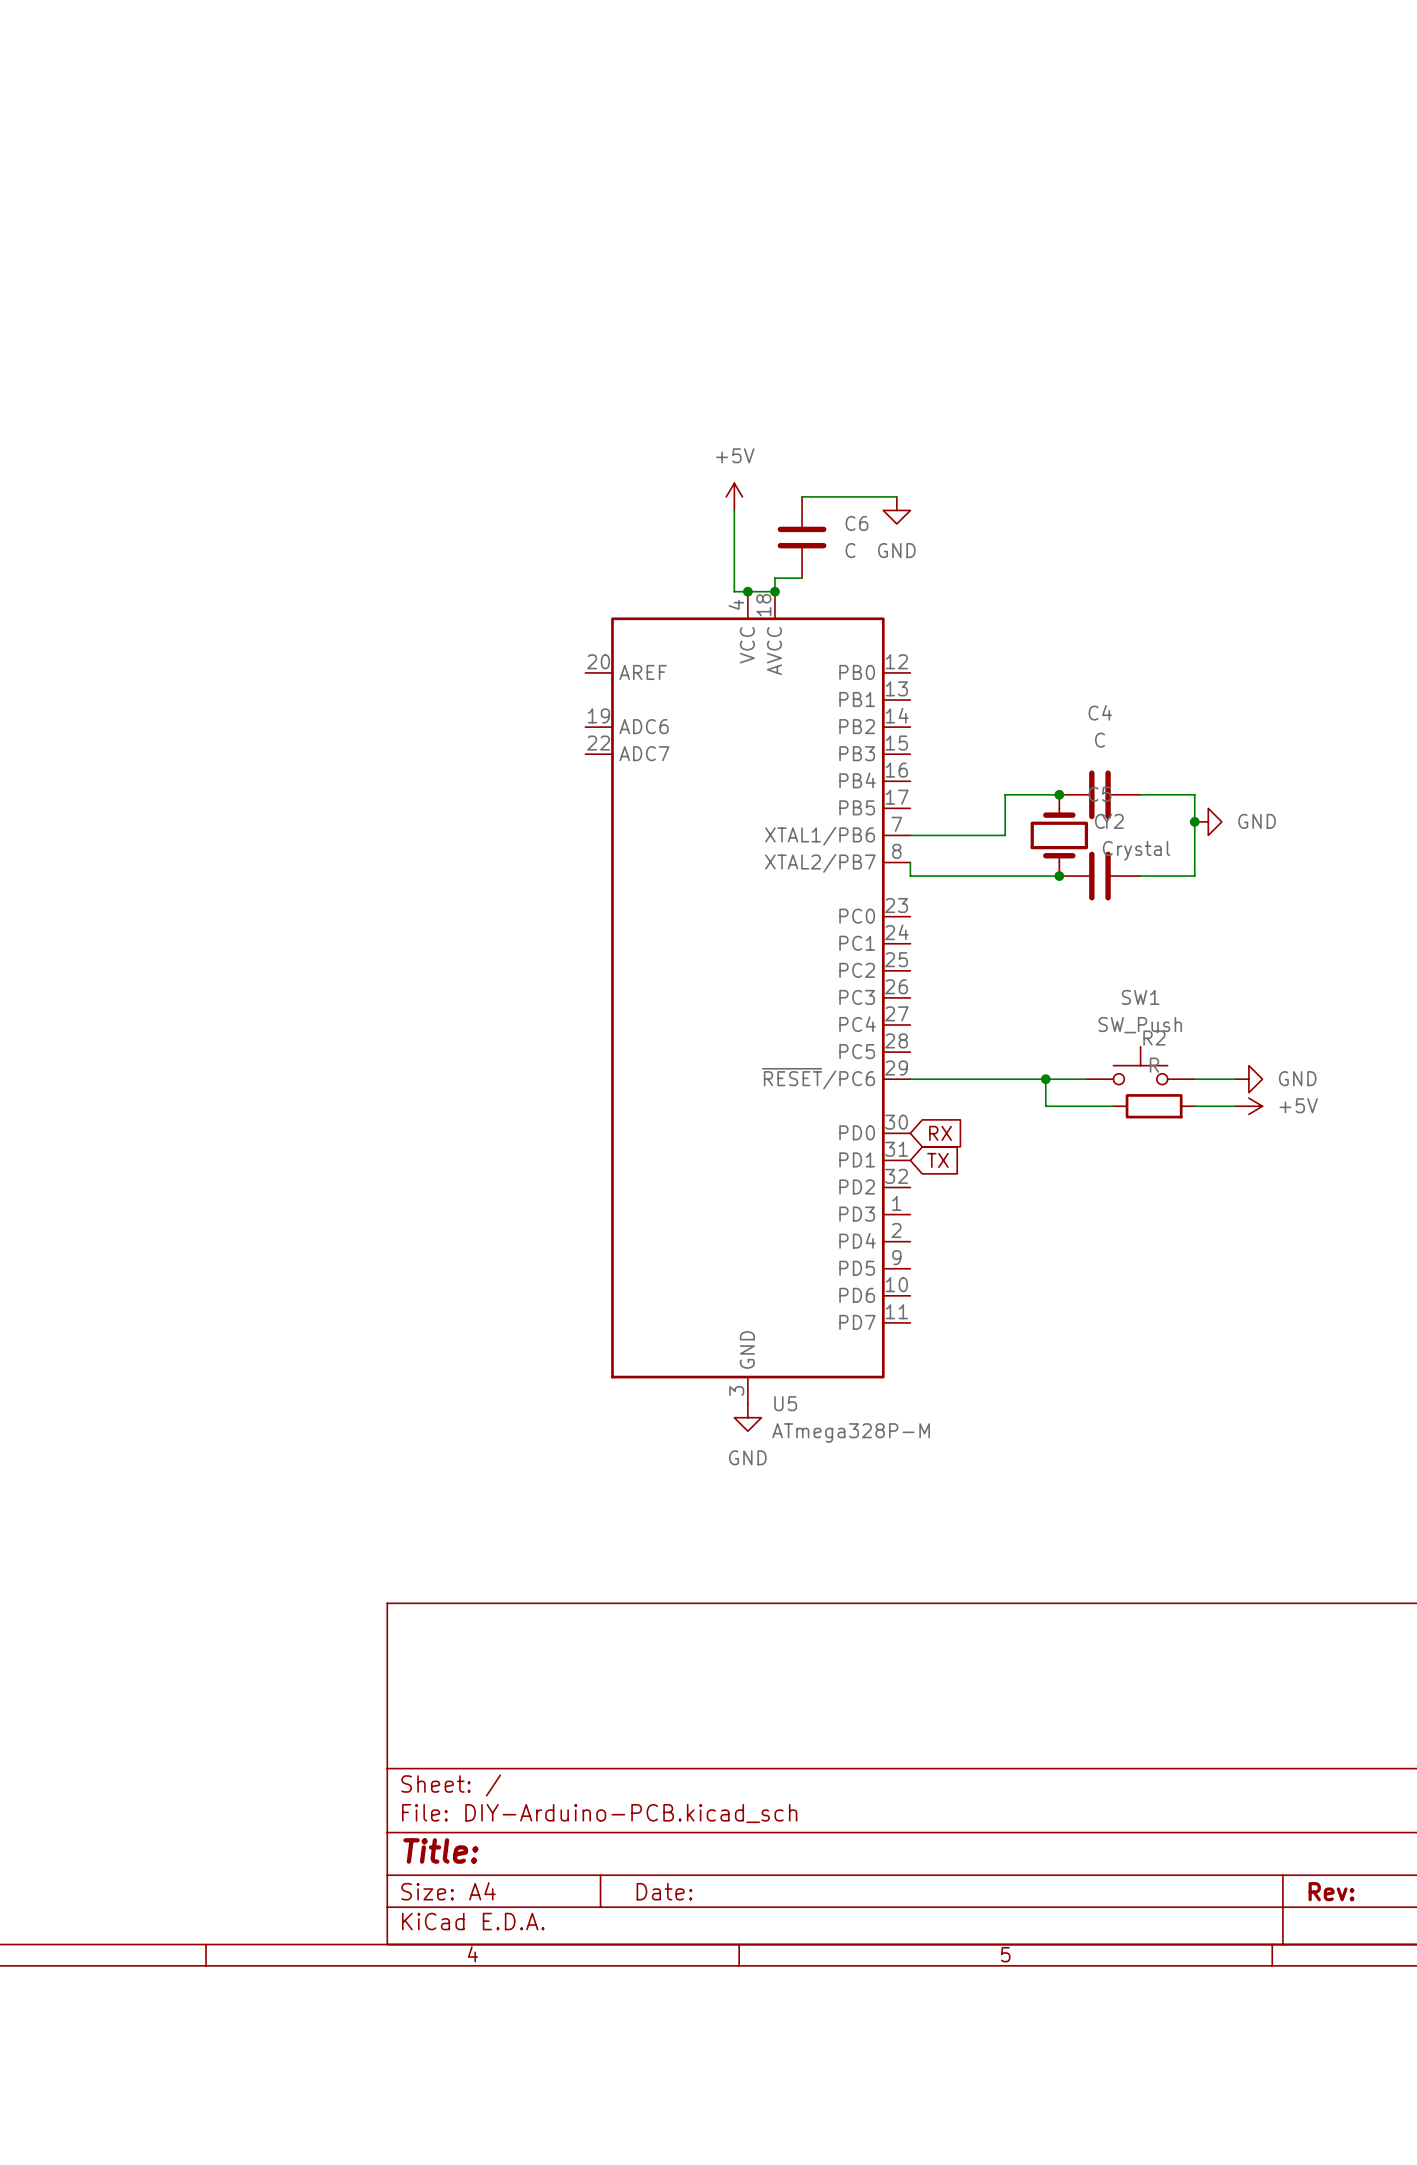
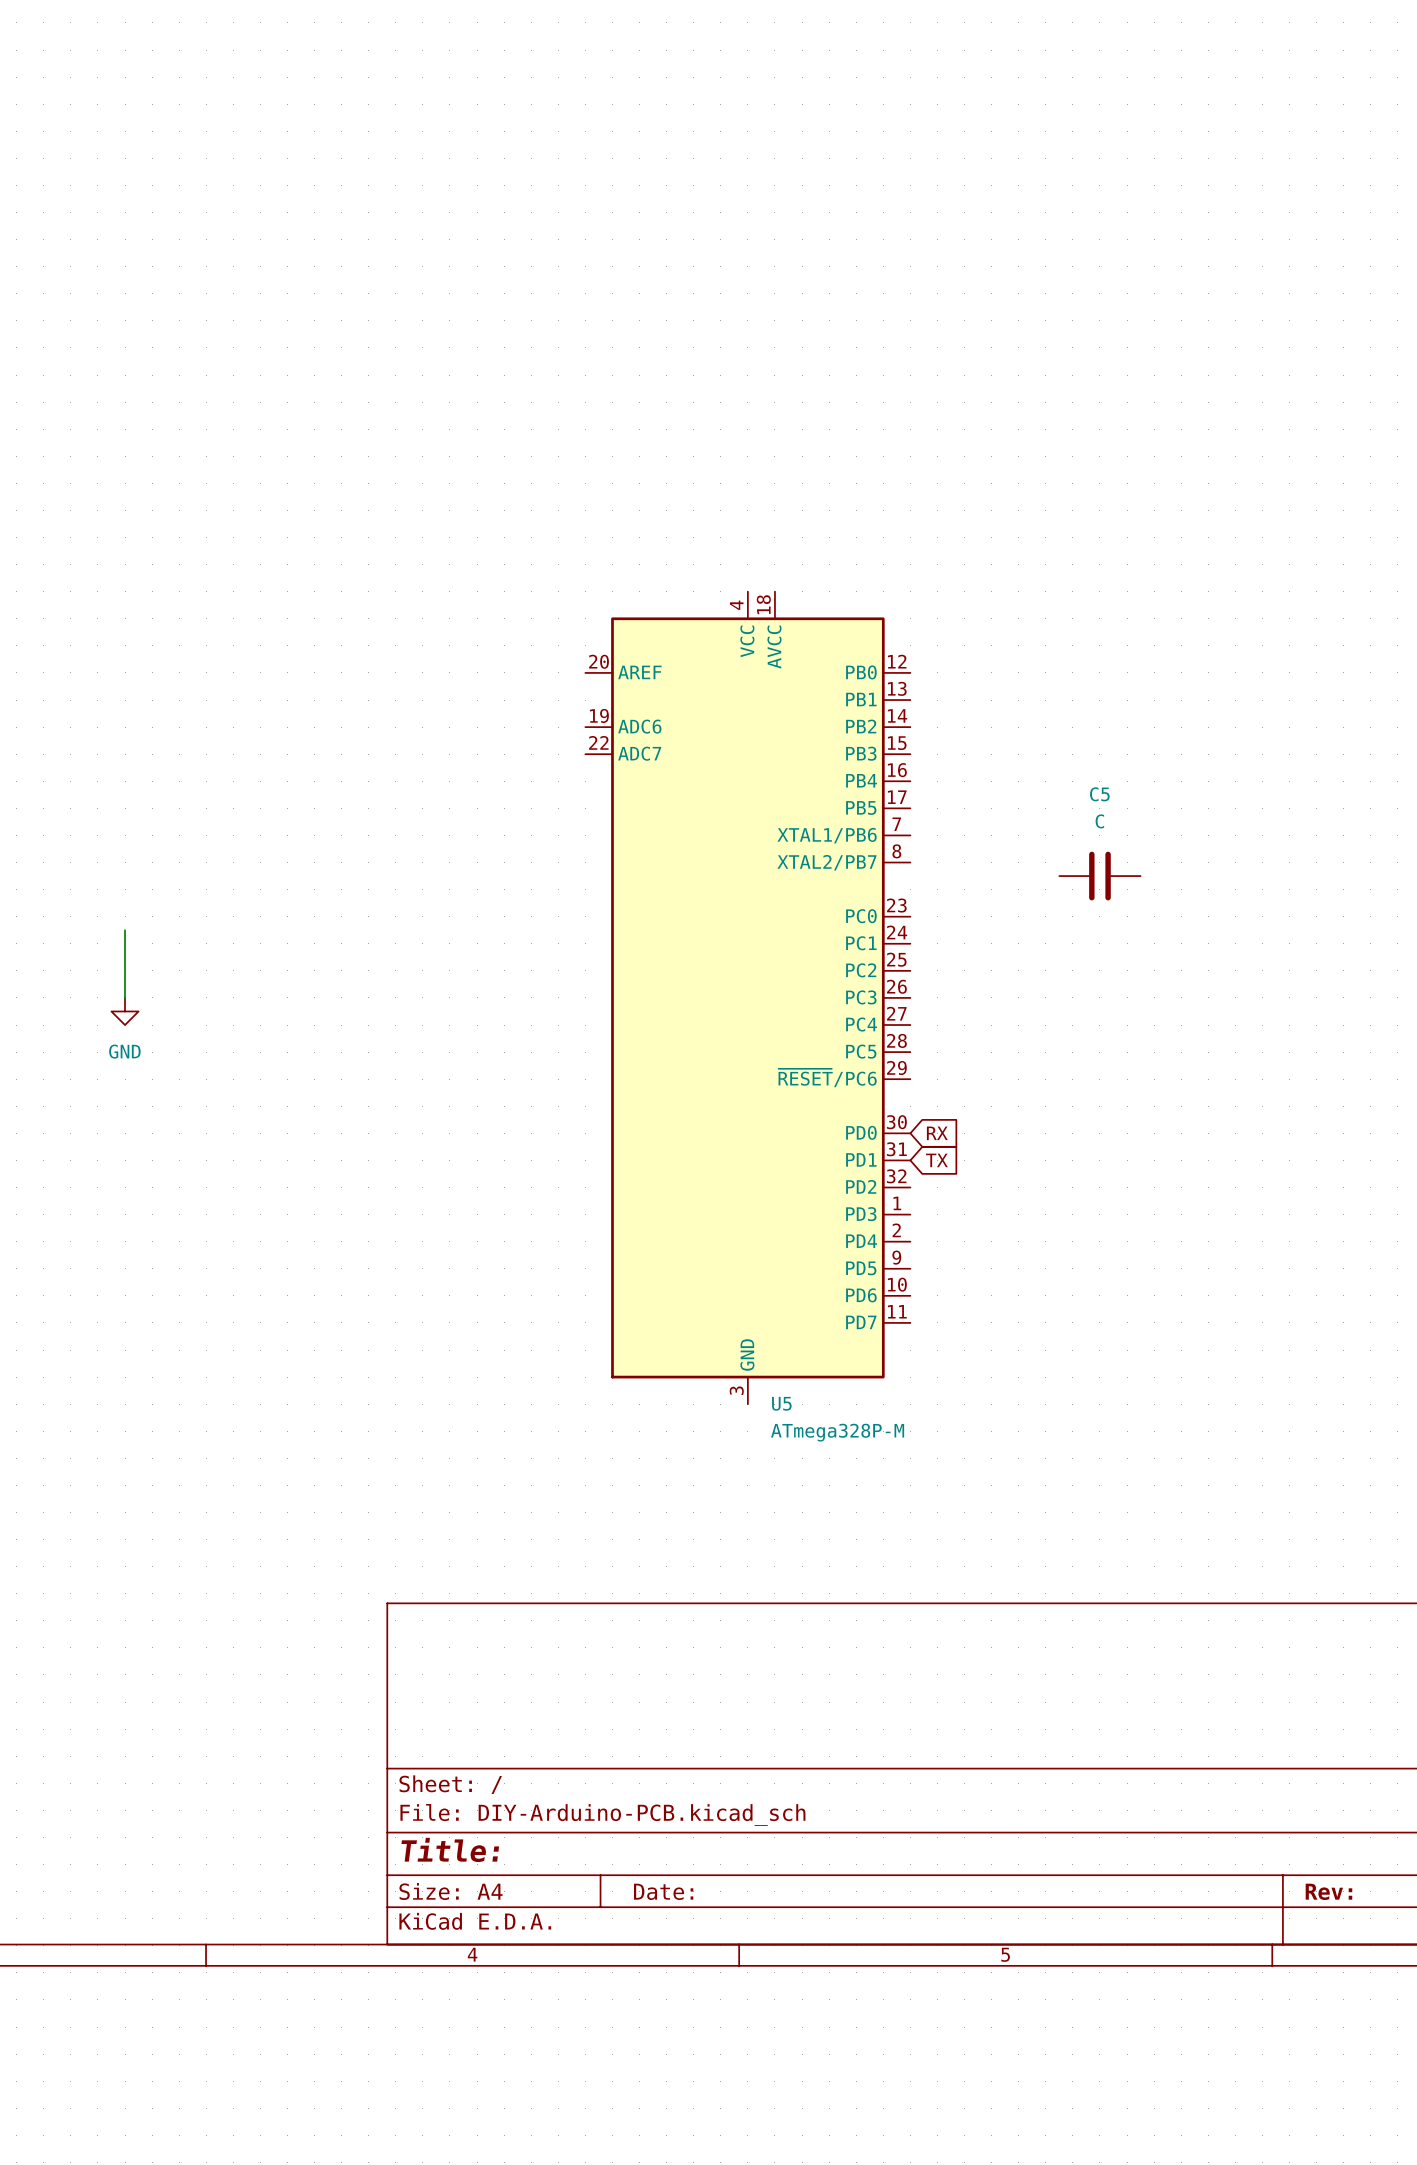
power symbol: +5V (734, 496) -> none
wire: (802, 496) (896, 496) -> none
wire: (734, 510) (734, 591) (774, 591) (774, 578) (802, 578) -> none
power symbol: GND (896, 510) -> none
C6: C (802, 537) -> none
junction: (747, 591) -> none
junction: (774, 591) -> none
wire: (1059, 794) (1005, 794) (1005, 835) (910, 835) -> none
junction: (1059, 794) -> none
C4: C (1099, 794) -> none
wire: (1140, 794) (1194, 794) (1194, 876) (1140, 876) -> none
junction: (1194, 821) -> none
power symbol: GND (1208, 821) -> none
Y2: Crystal (1059, 835) -> none
wire: (910, 862) (910, 876) (1059, 876) -> none
junction: (1059, 876) -> none
wire: none -> (125, 930) (125, 997)
power symbol: none -> GND (125, 1011)
SW1: SW_Push (1140, 1065) -> none
wire: (910, 1079) (1086, 1079) -> none
wire: (1045, 1079) (1045, 1106) (1113, 1106) -> none
junction: (1045, 1079) -> none
wire: (1194, 1079) (1235, 1079) -> none
power symbol: GND (1248, 1079) -> none
R2: R (1154, 1106) -> none
wire: (1194, 1106) (1235, 1106) -> none
power symbol: +5V (1248, 1106) -> none
power symbol: GND (747, 1417) -> none

